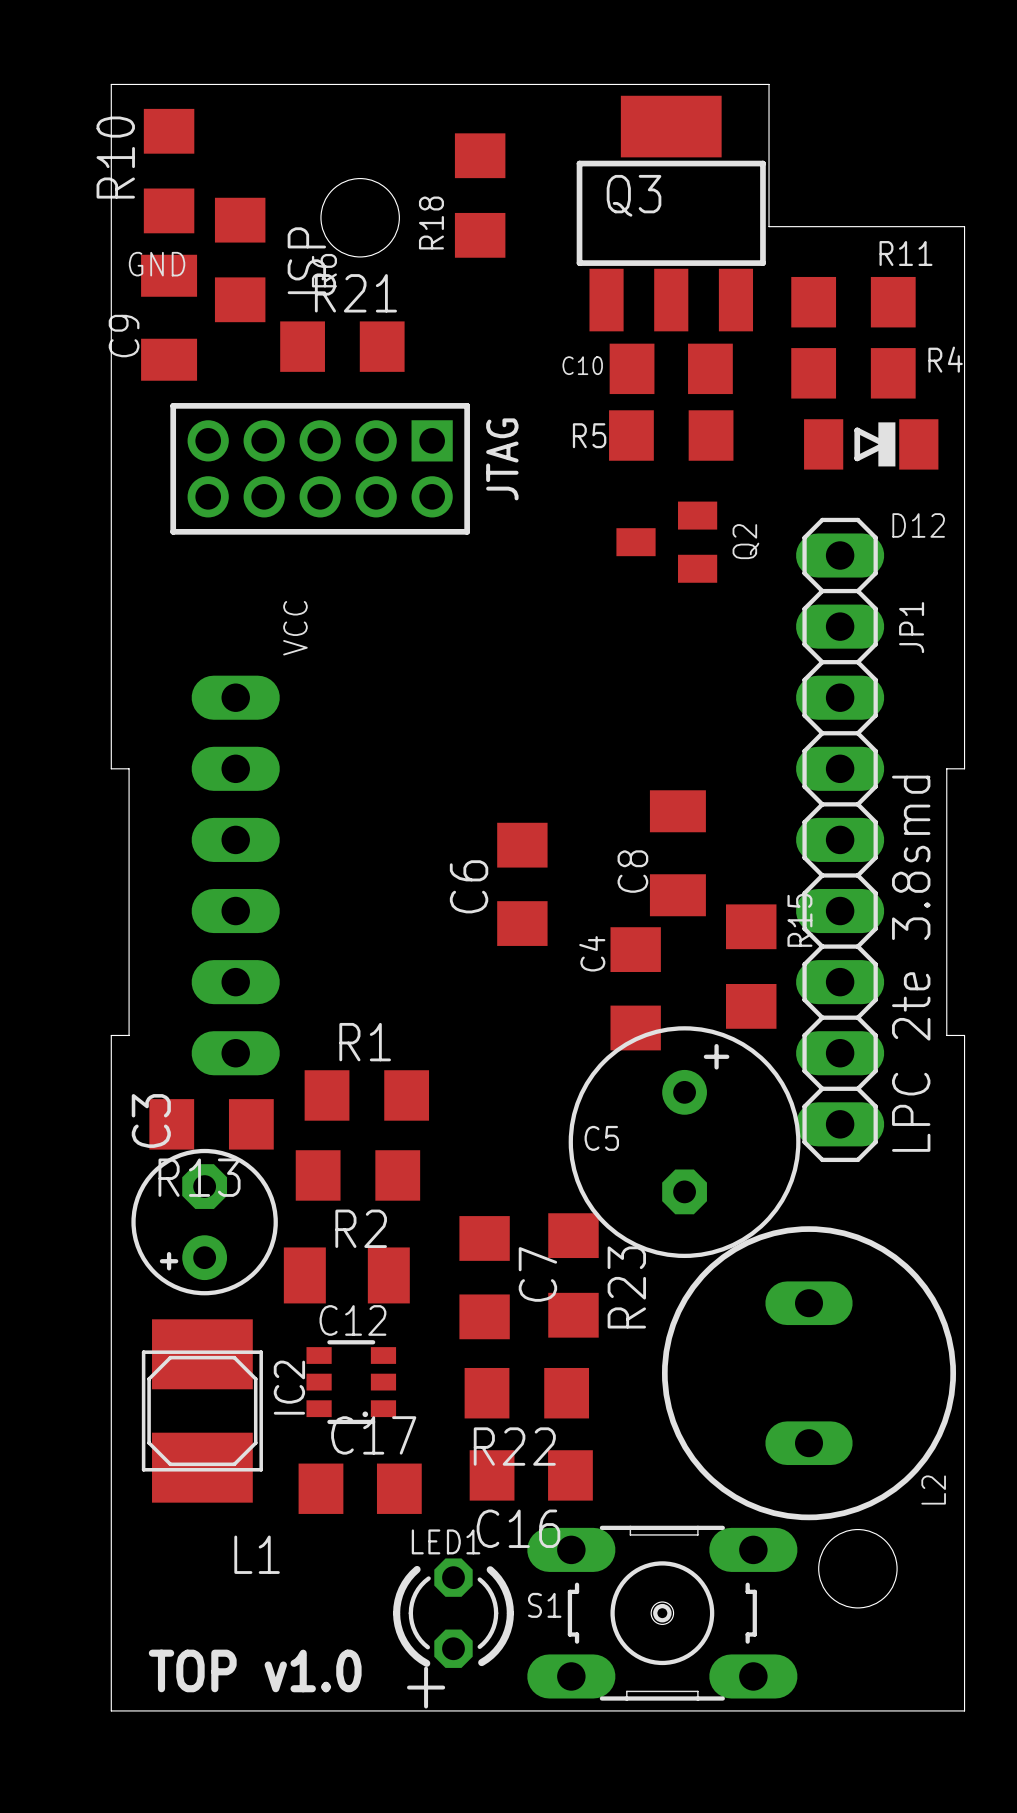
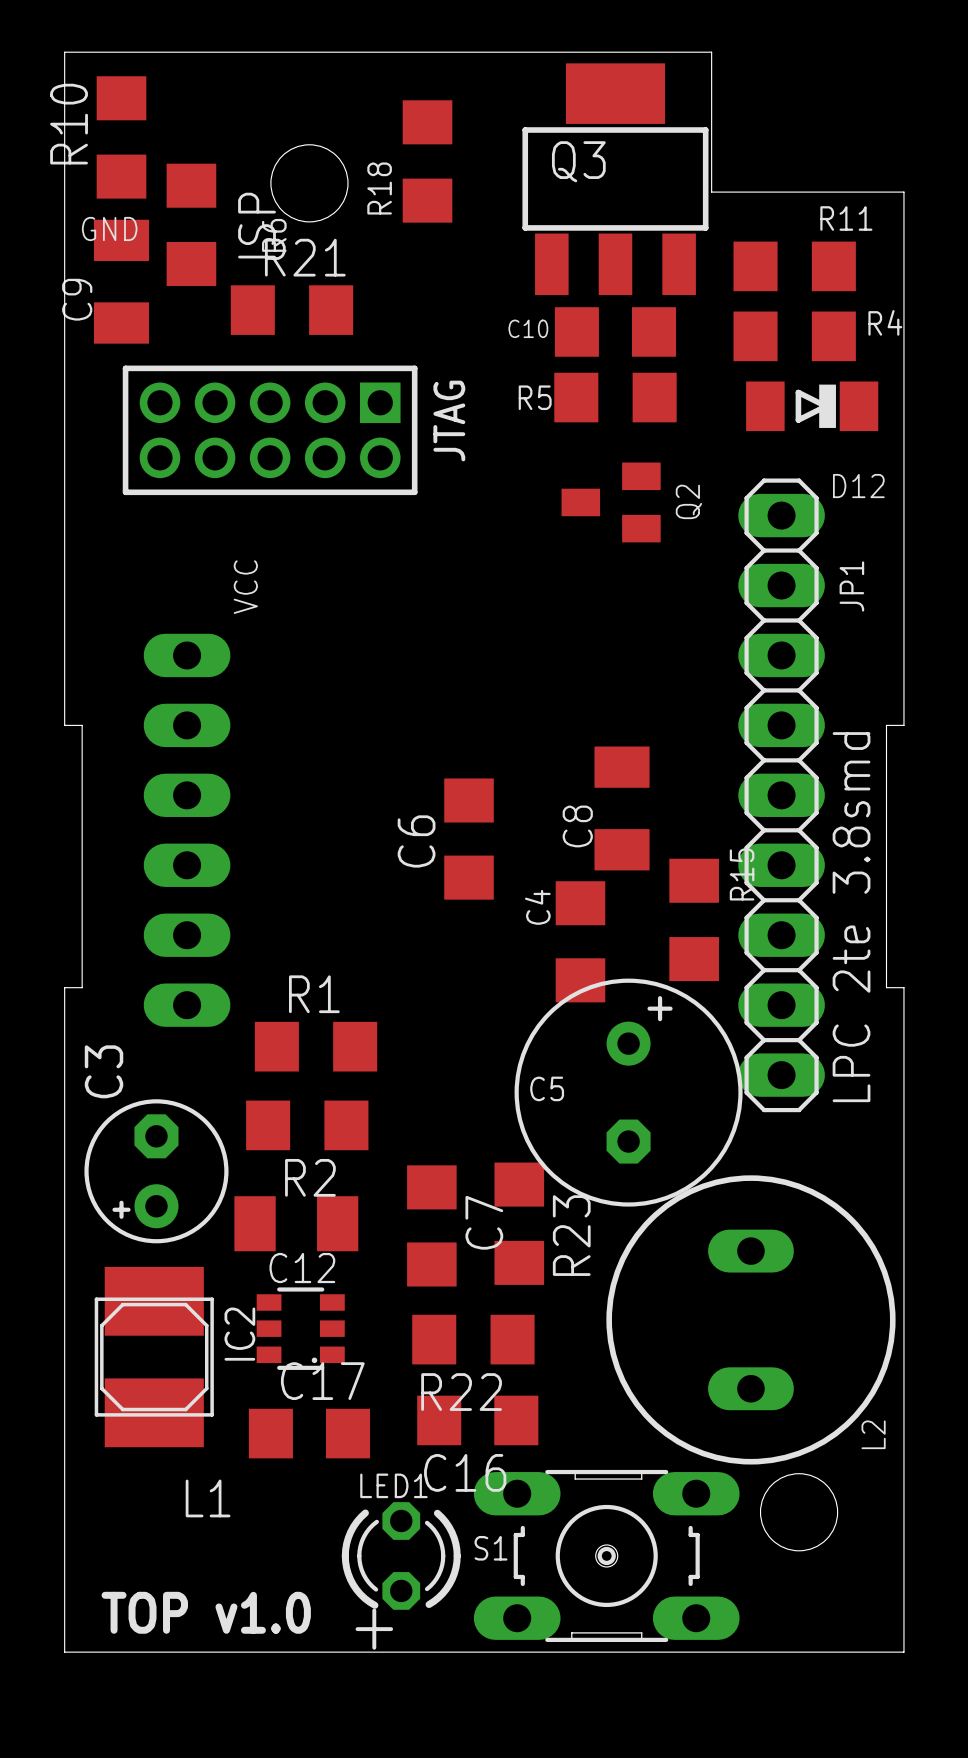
R13: (211, 1124) -> none

